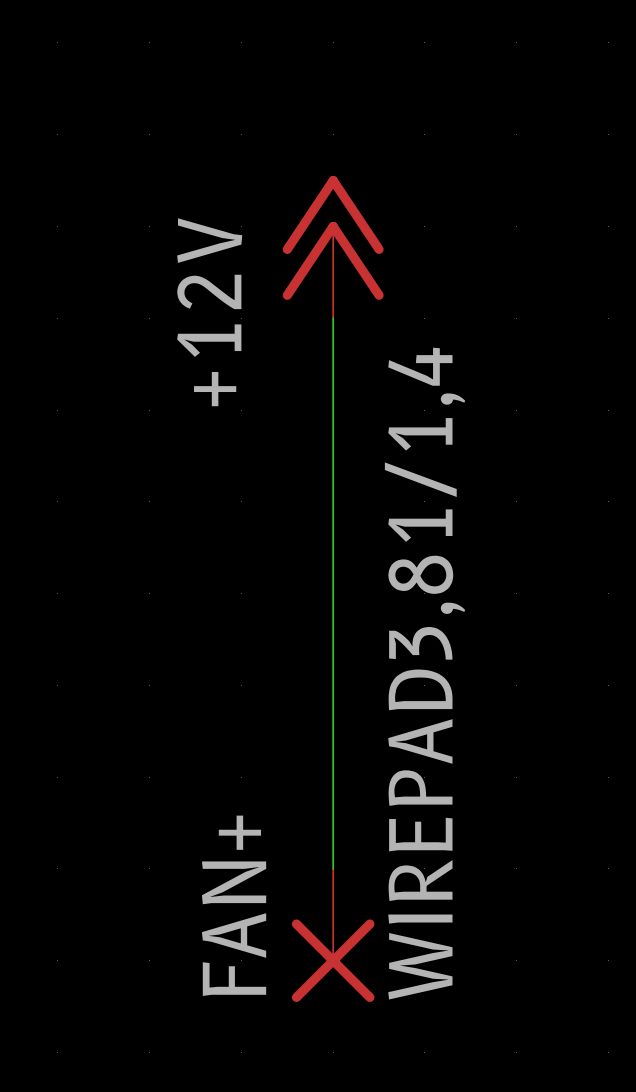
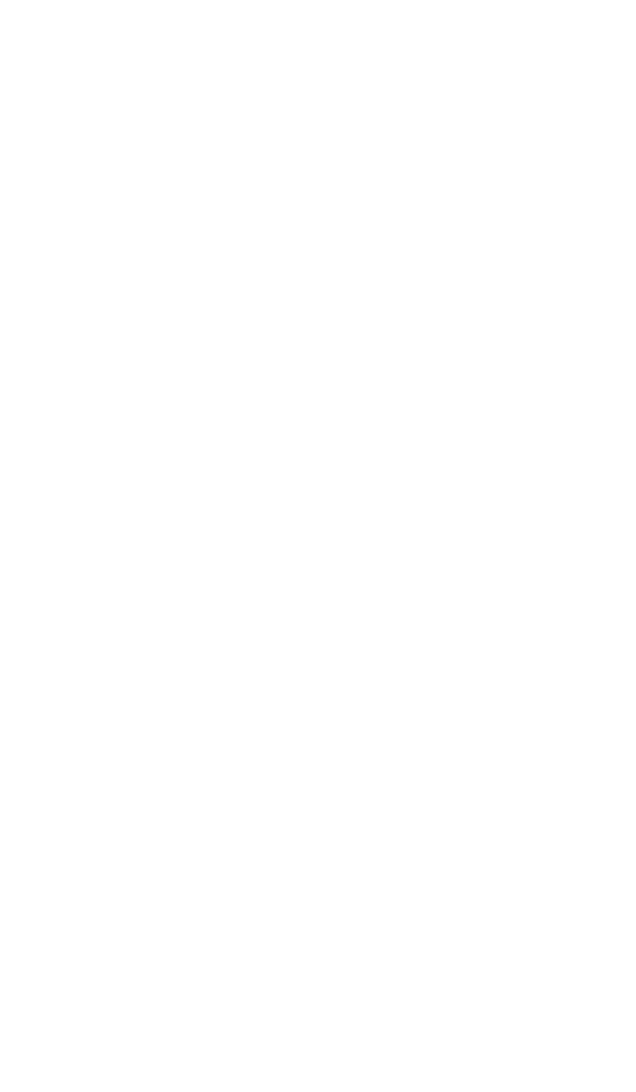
power symbol: +12V (333, 247) -> none
wire: (333, 318) (333, 868) -> none
FAN+: WIREPAD3,81/1,4 (333, 935) -> none

